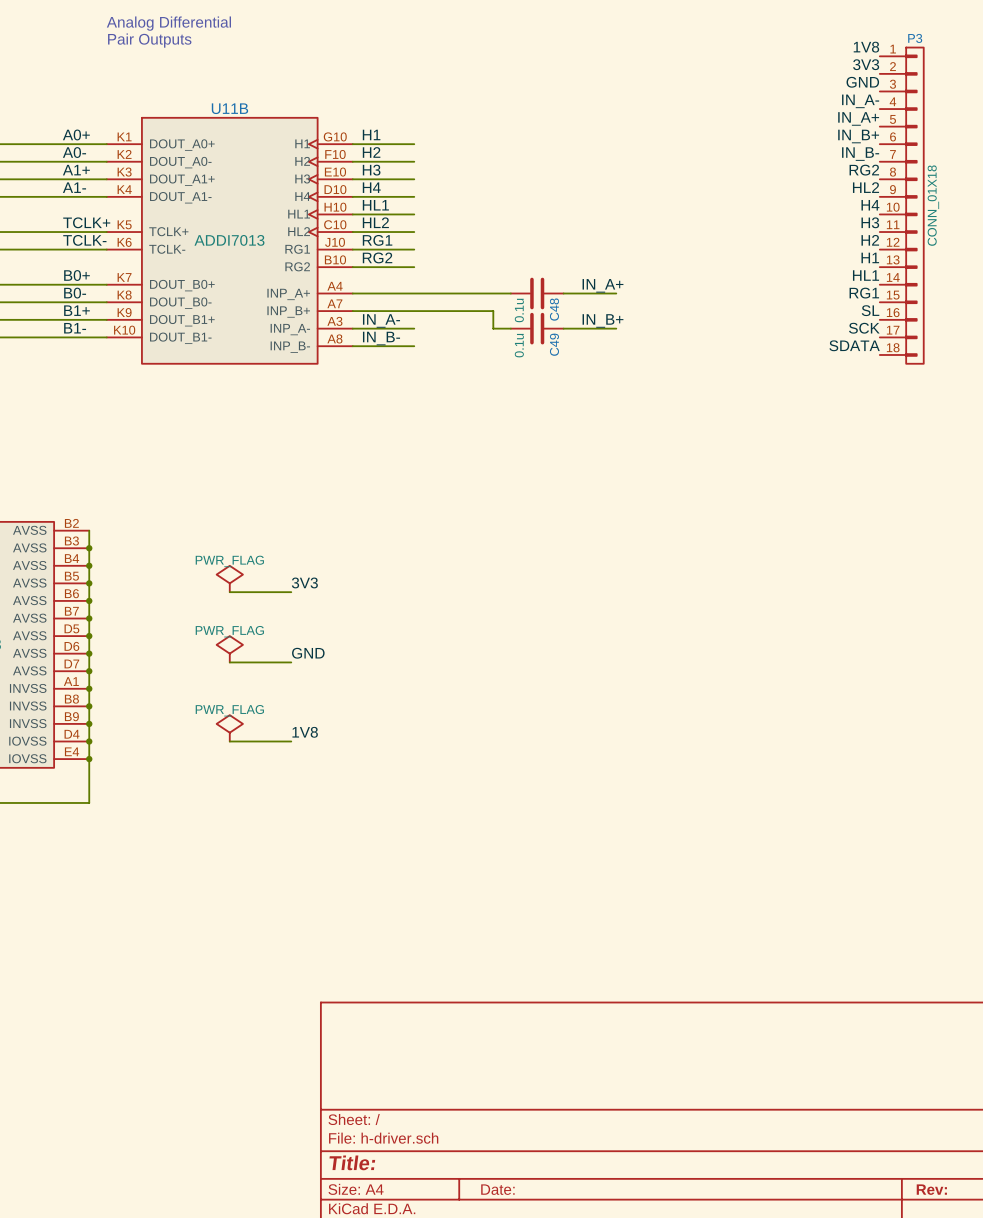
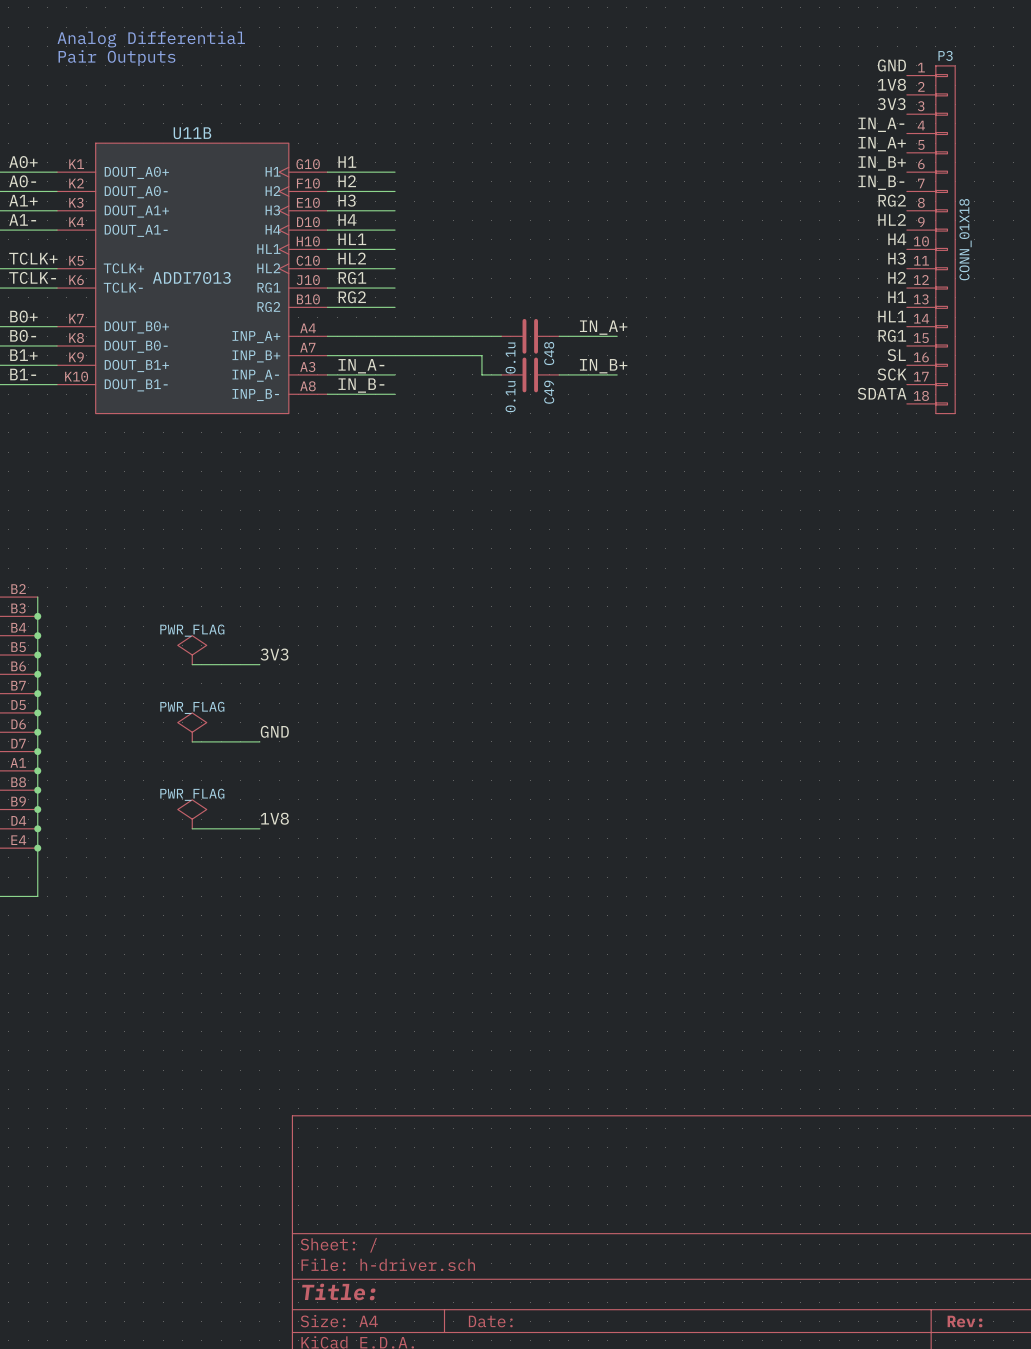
label: 1V8 (866, 47) -> GND (891, 65)
label: 3V3 (866, 64) -> 1V8 (891, 84)
label: GND (862, 82) -> 3V3 (891, 104)

